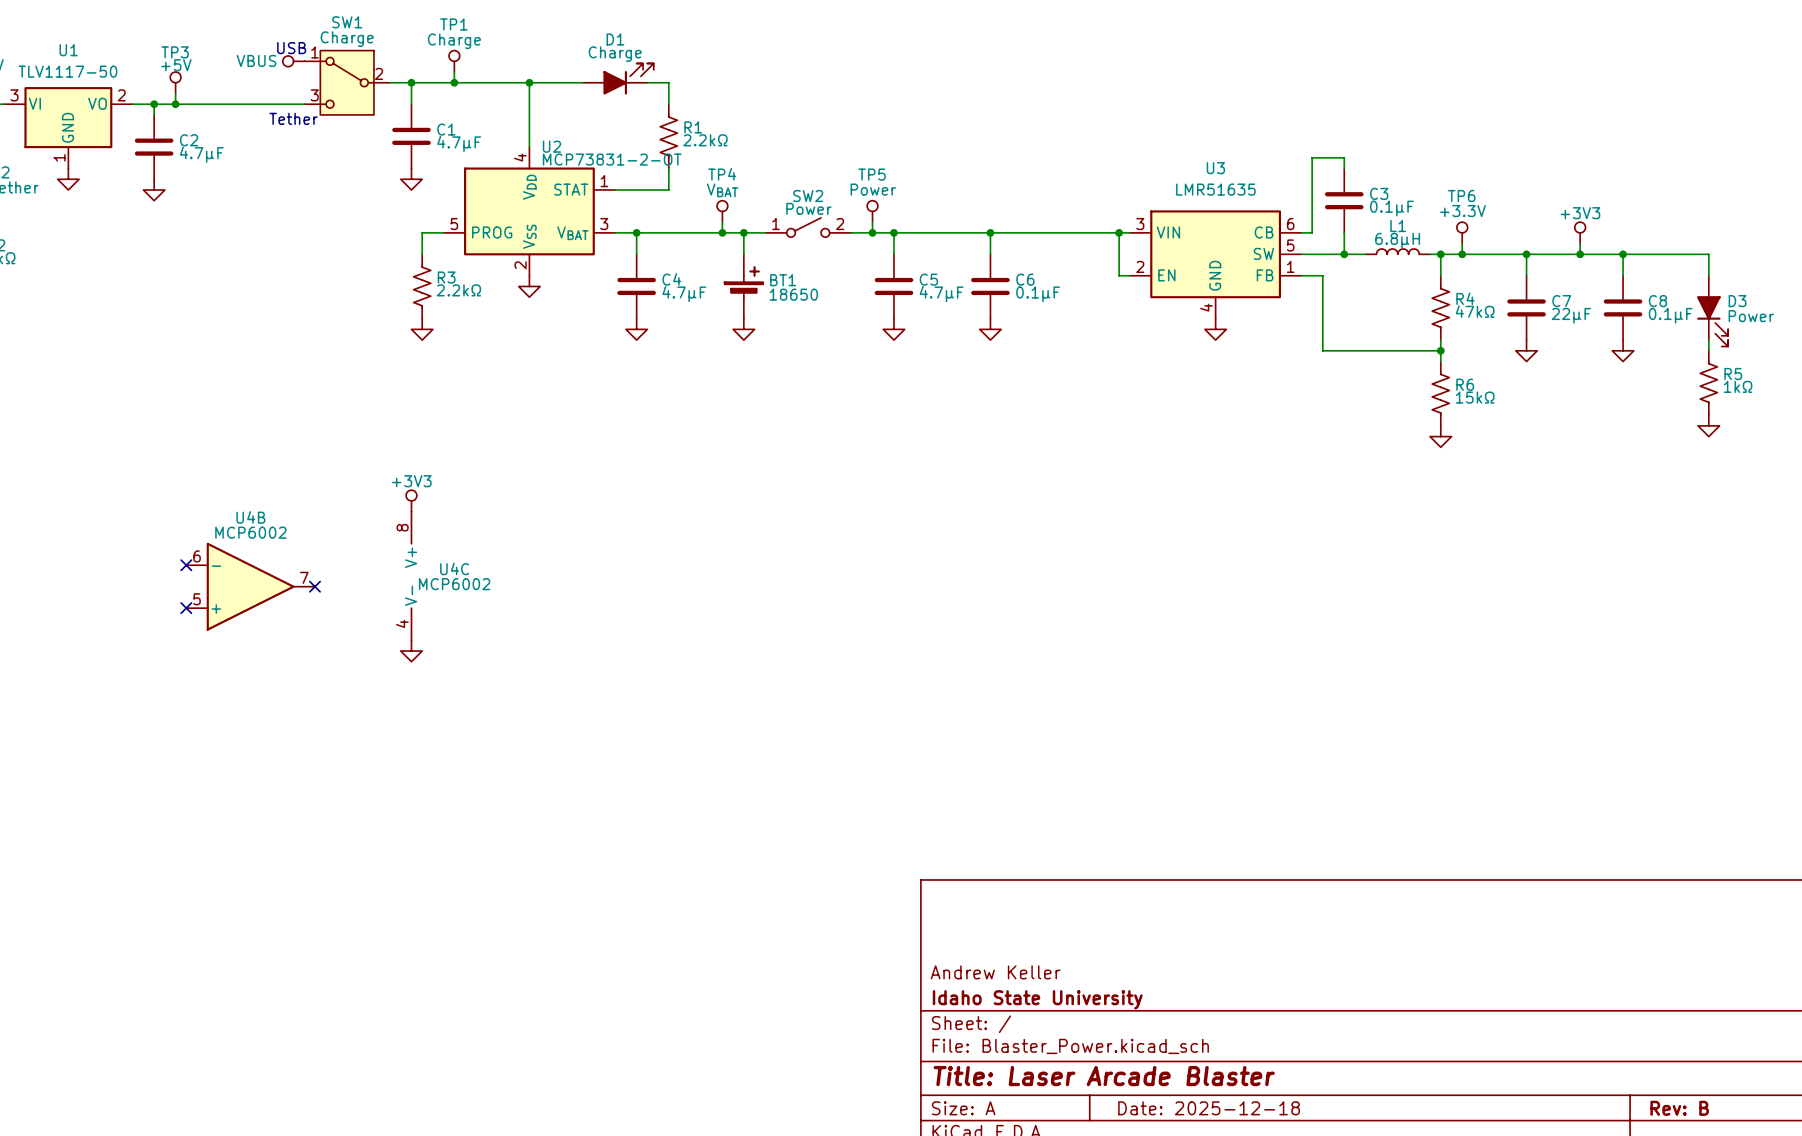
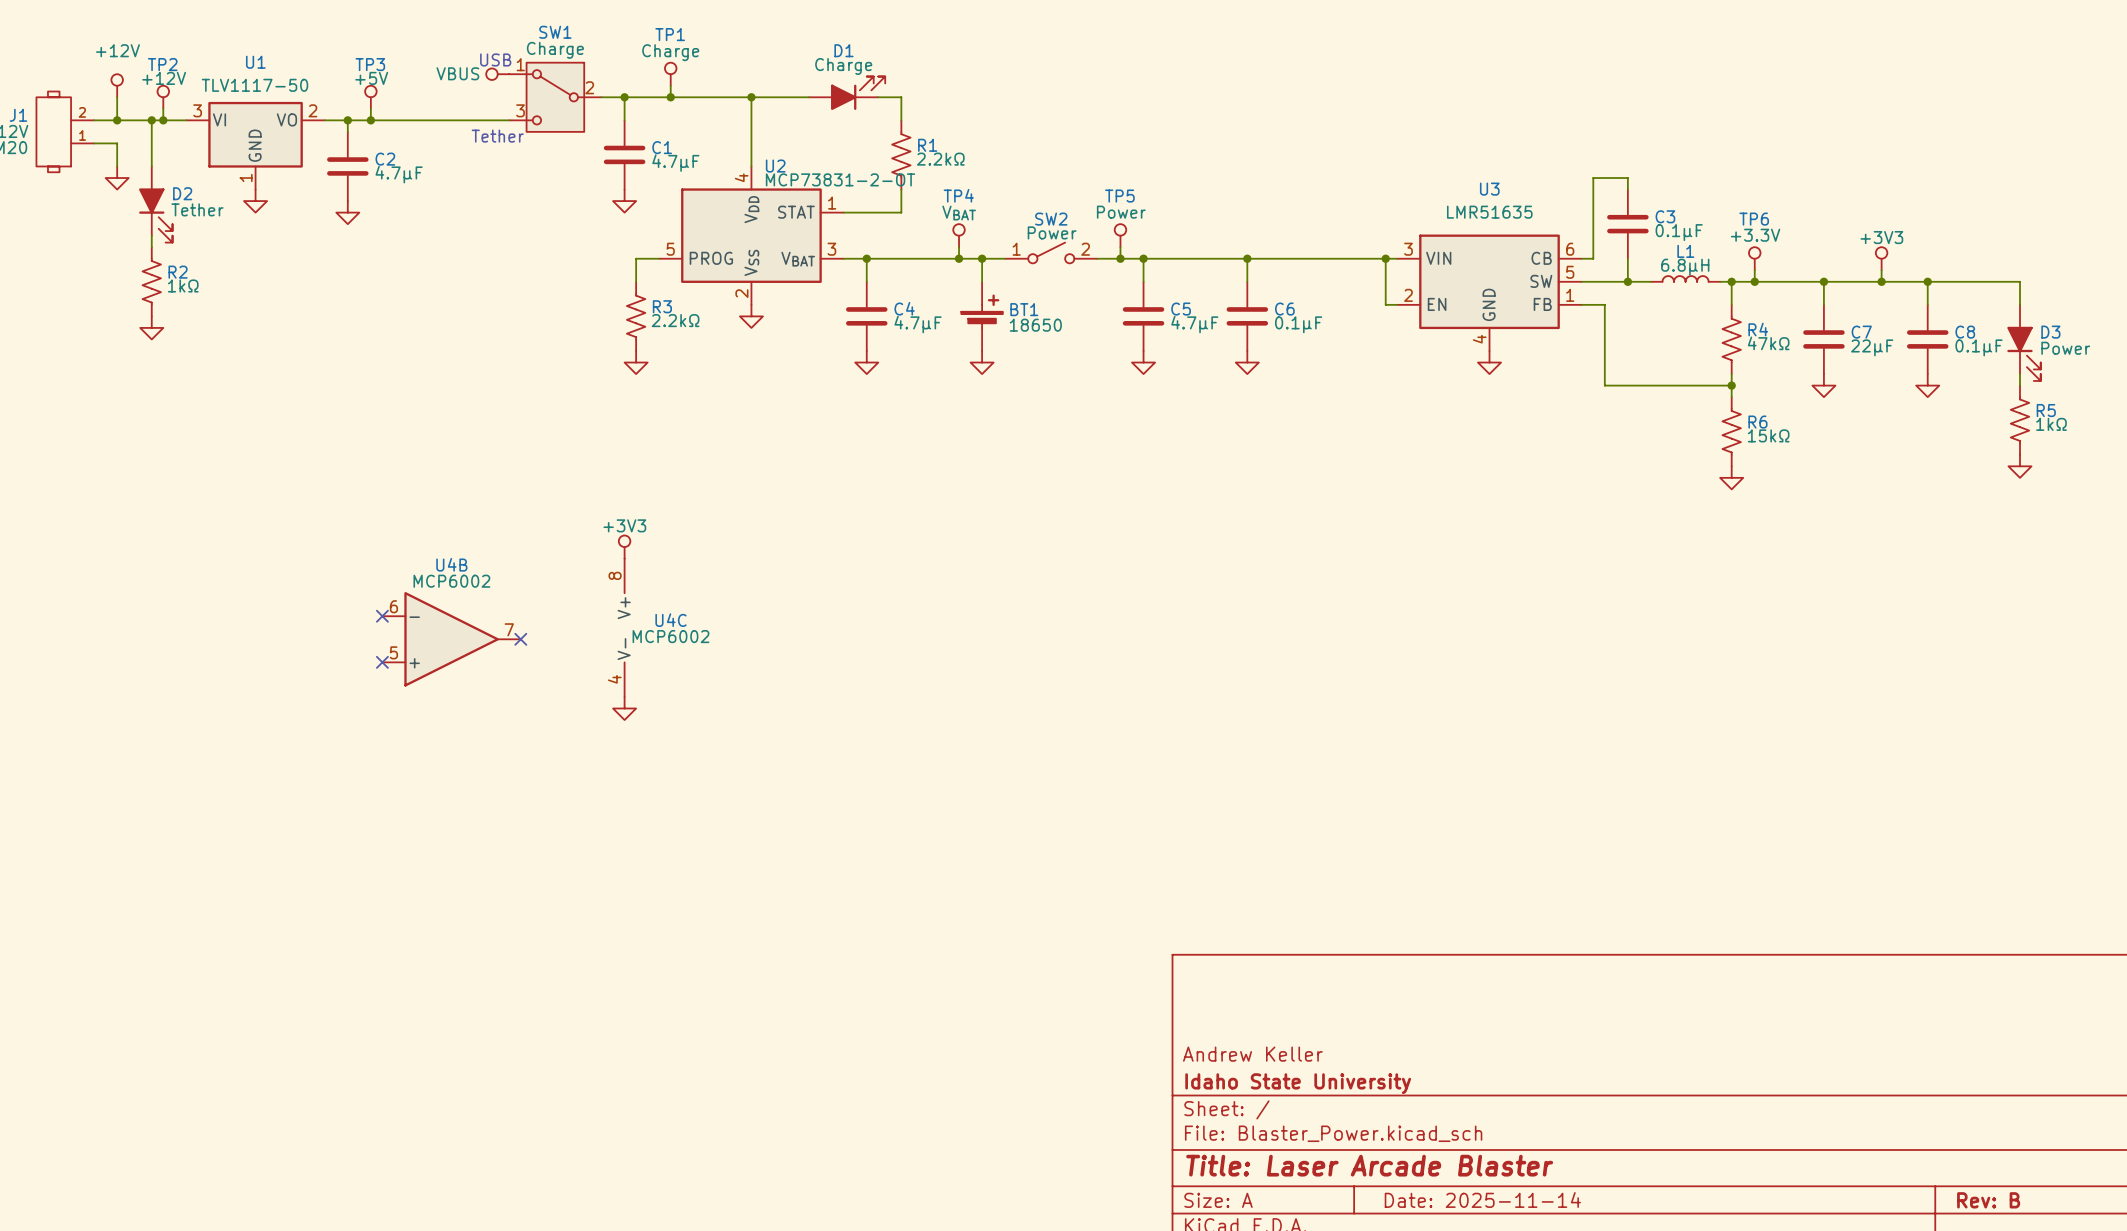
title block: Date: 2025-12-18 (1209, 1108) -> Date: 2025-11-14 (1482, 1200)

